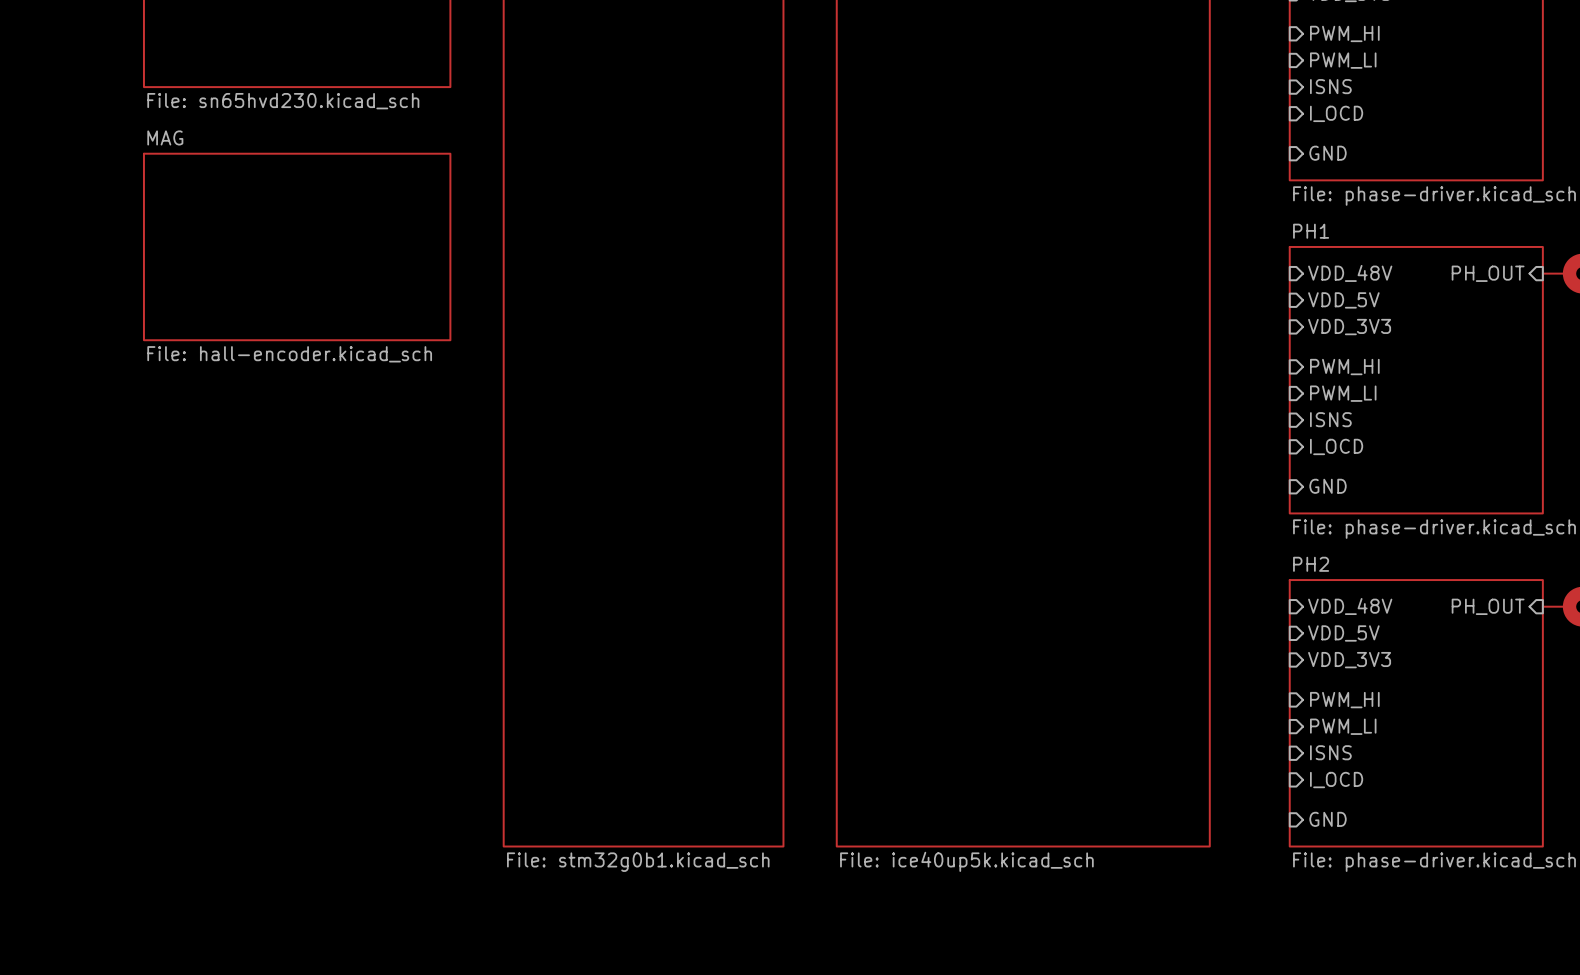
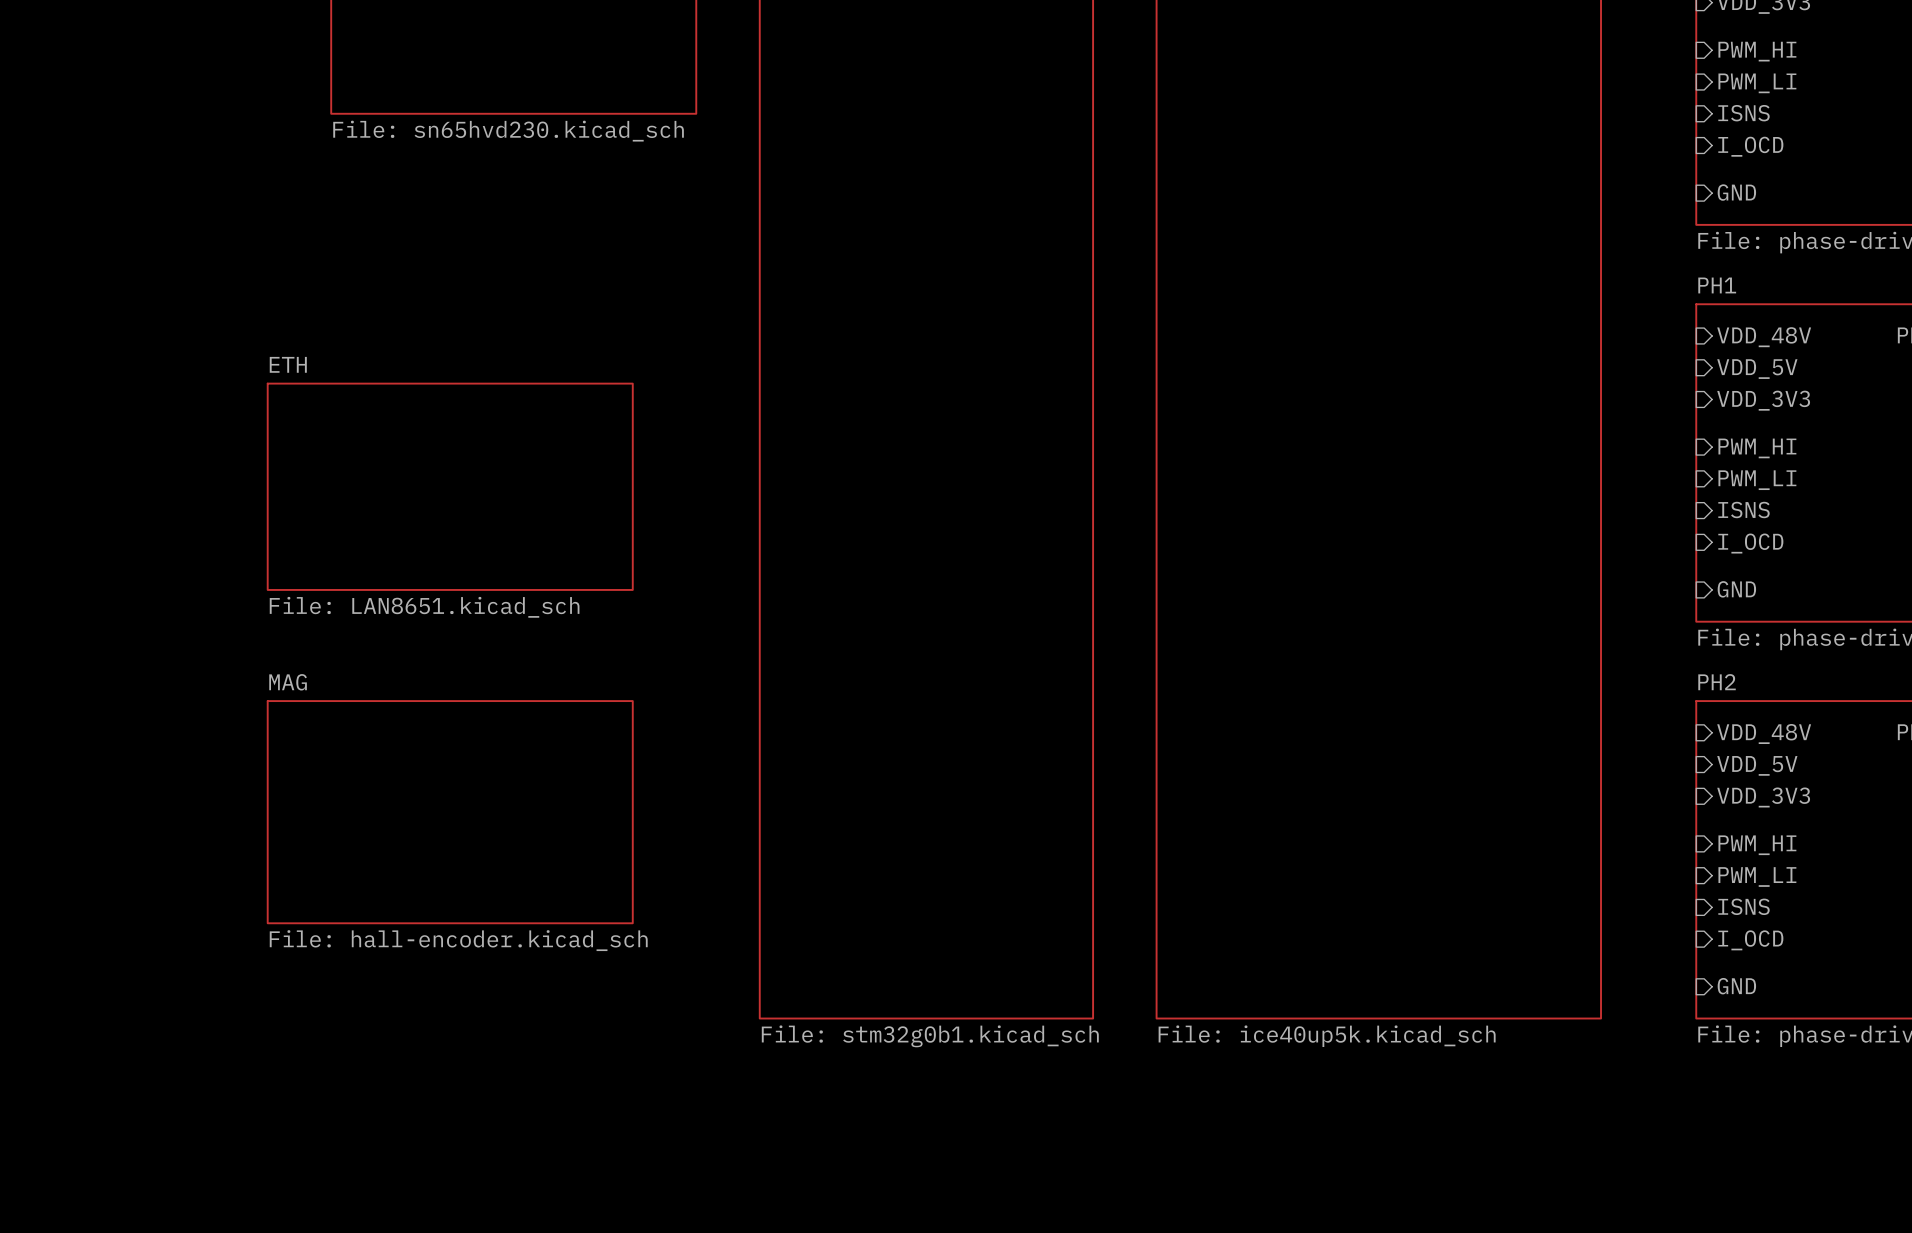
sheet MAG: File: hall-encoder.kicad_sch (297, 246) -> none
sheet ETH: none -> File: LAN8651.kicad_sch (450, 486)
sheet MAG: none -> File: hall-encoder.kicad_sch (450, 812)

